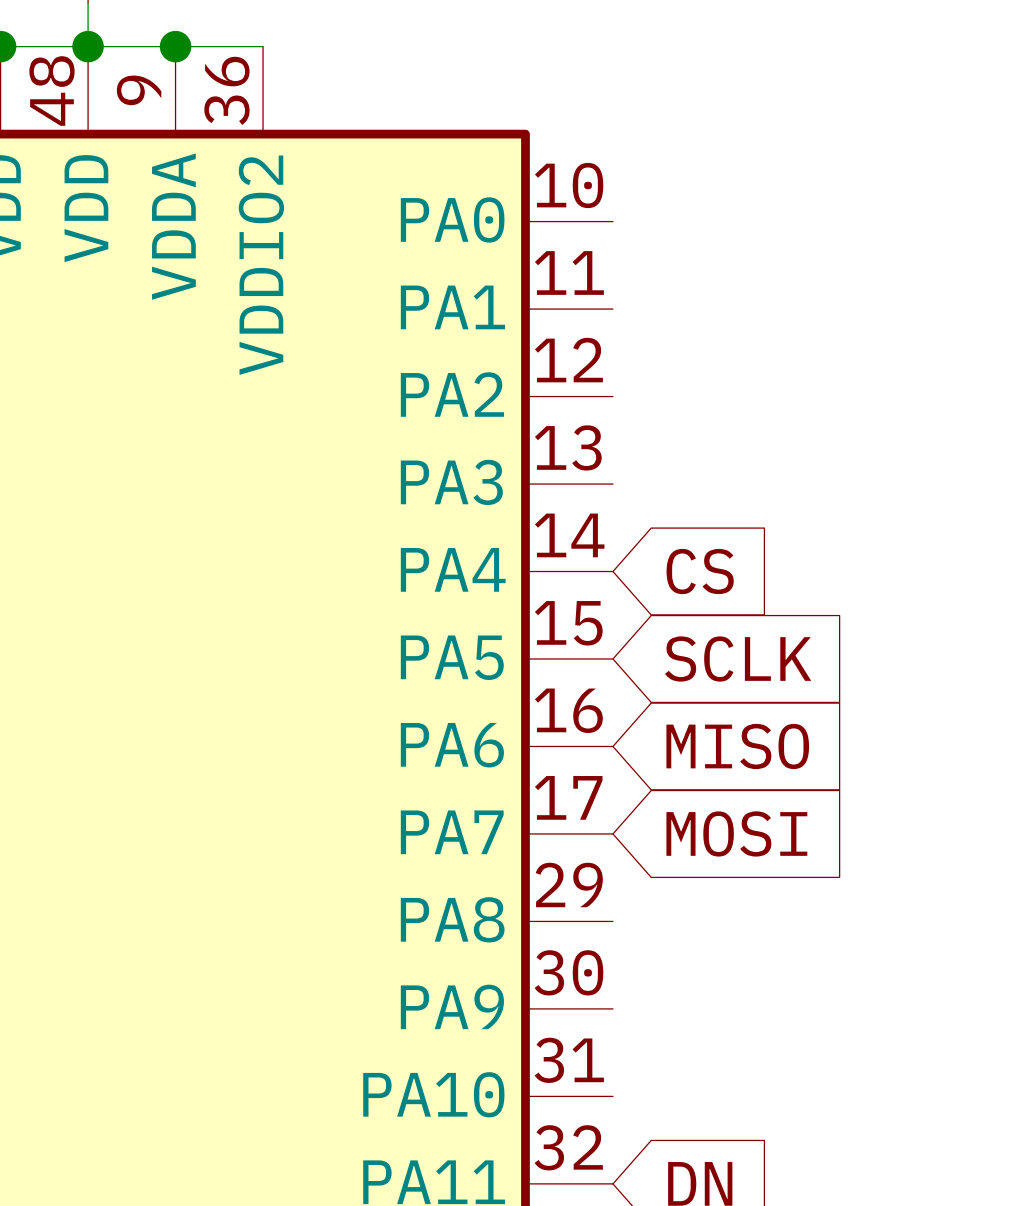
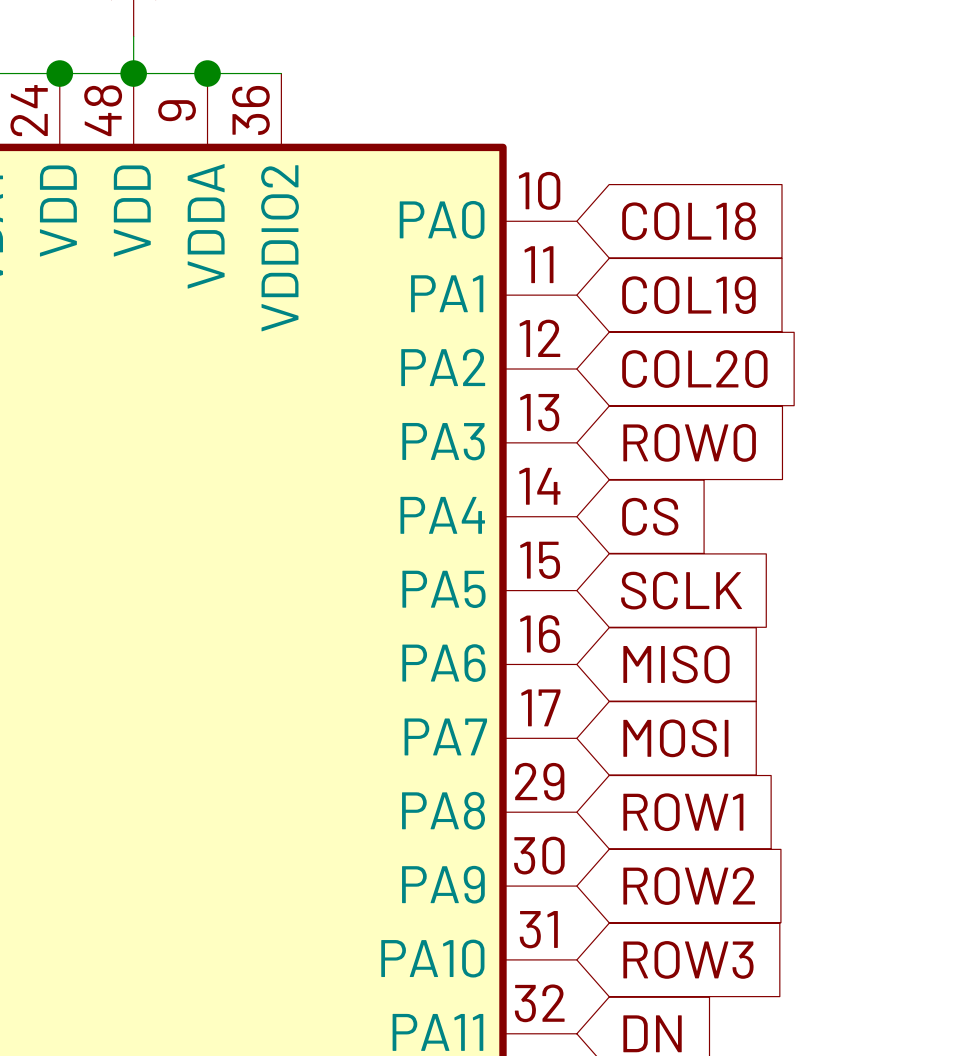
global label: none -> COL18 (689, 221)
global label: none -> COL19 (688, 295)
global label: none -> COL20 (694, 369)
global label: none -> ROW0 (689, 442)
global label: none -> ROW1 (683, 812)
global label: none -> ROW2 (689, 886)
global label: none -> ROW3 (688, 959)

